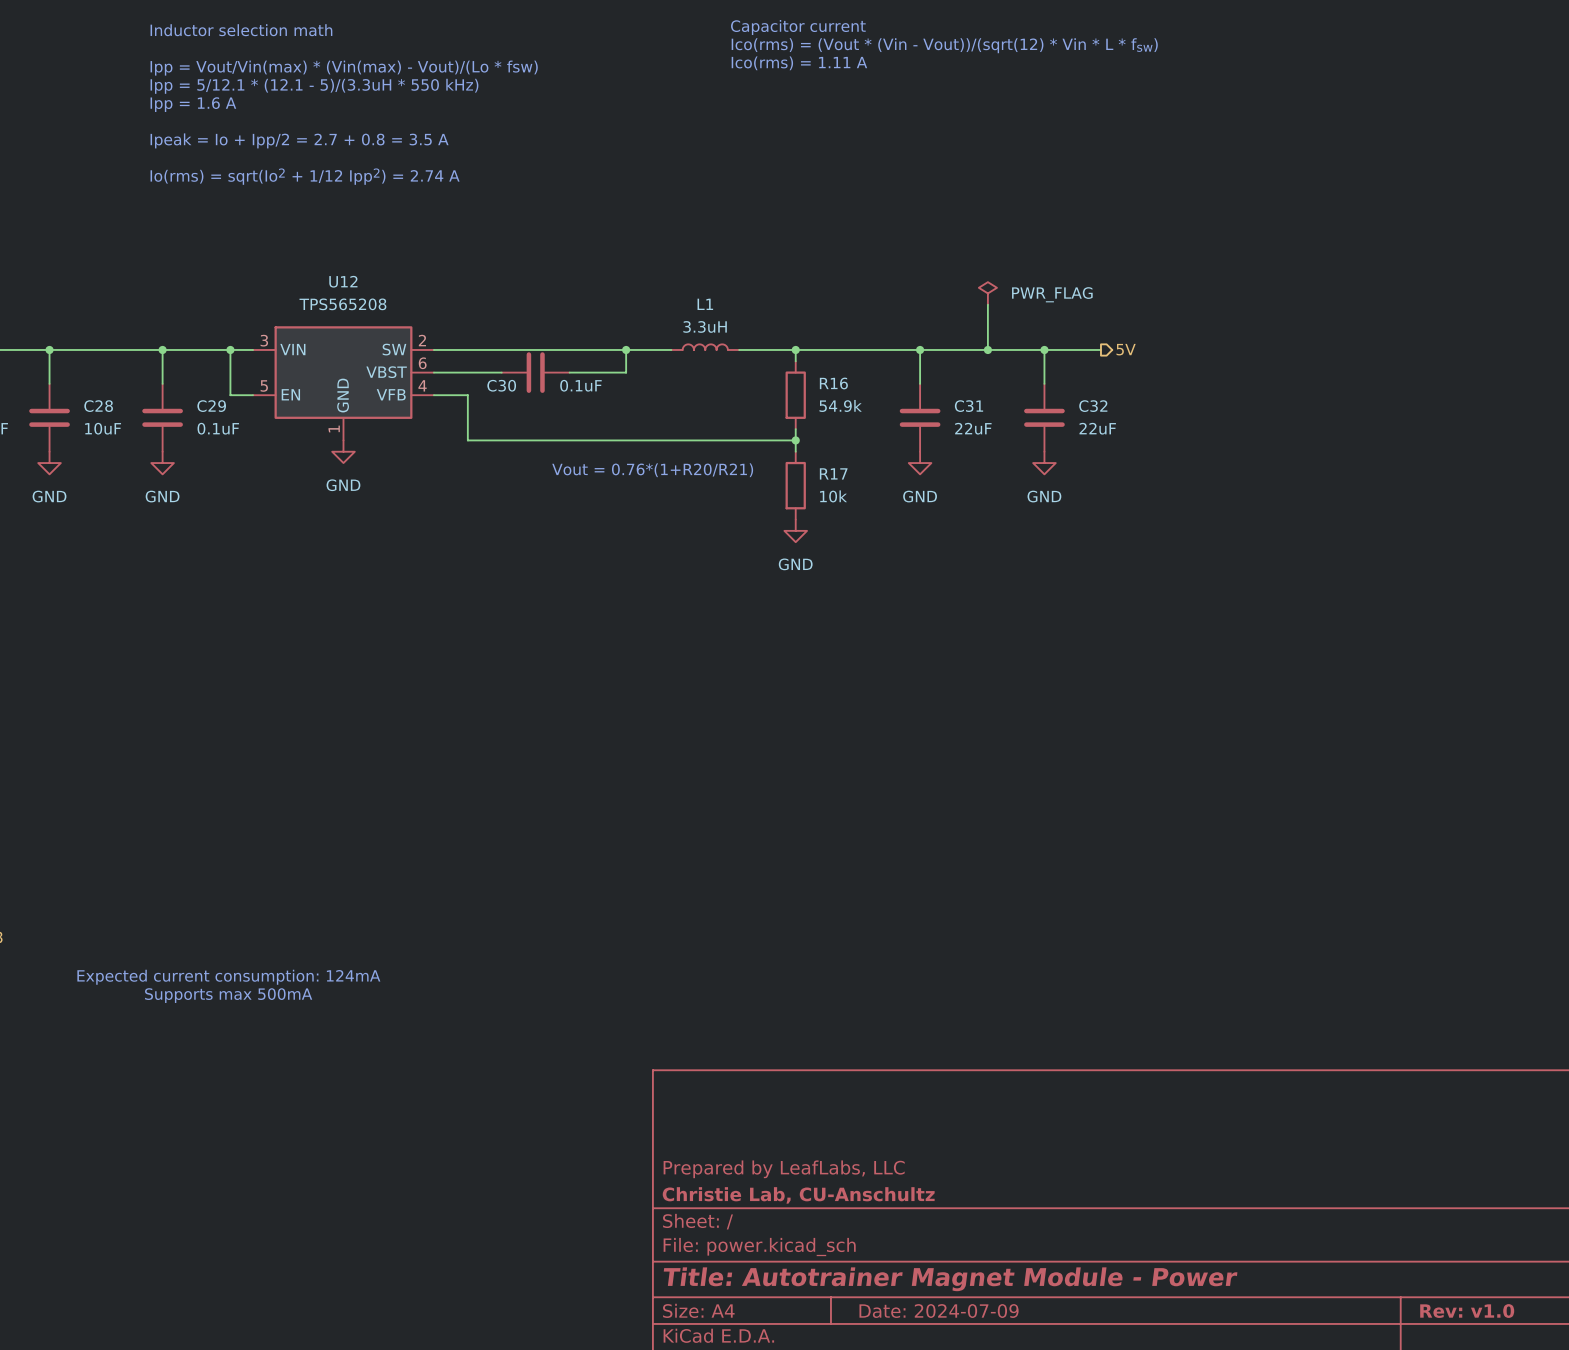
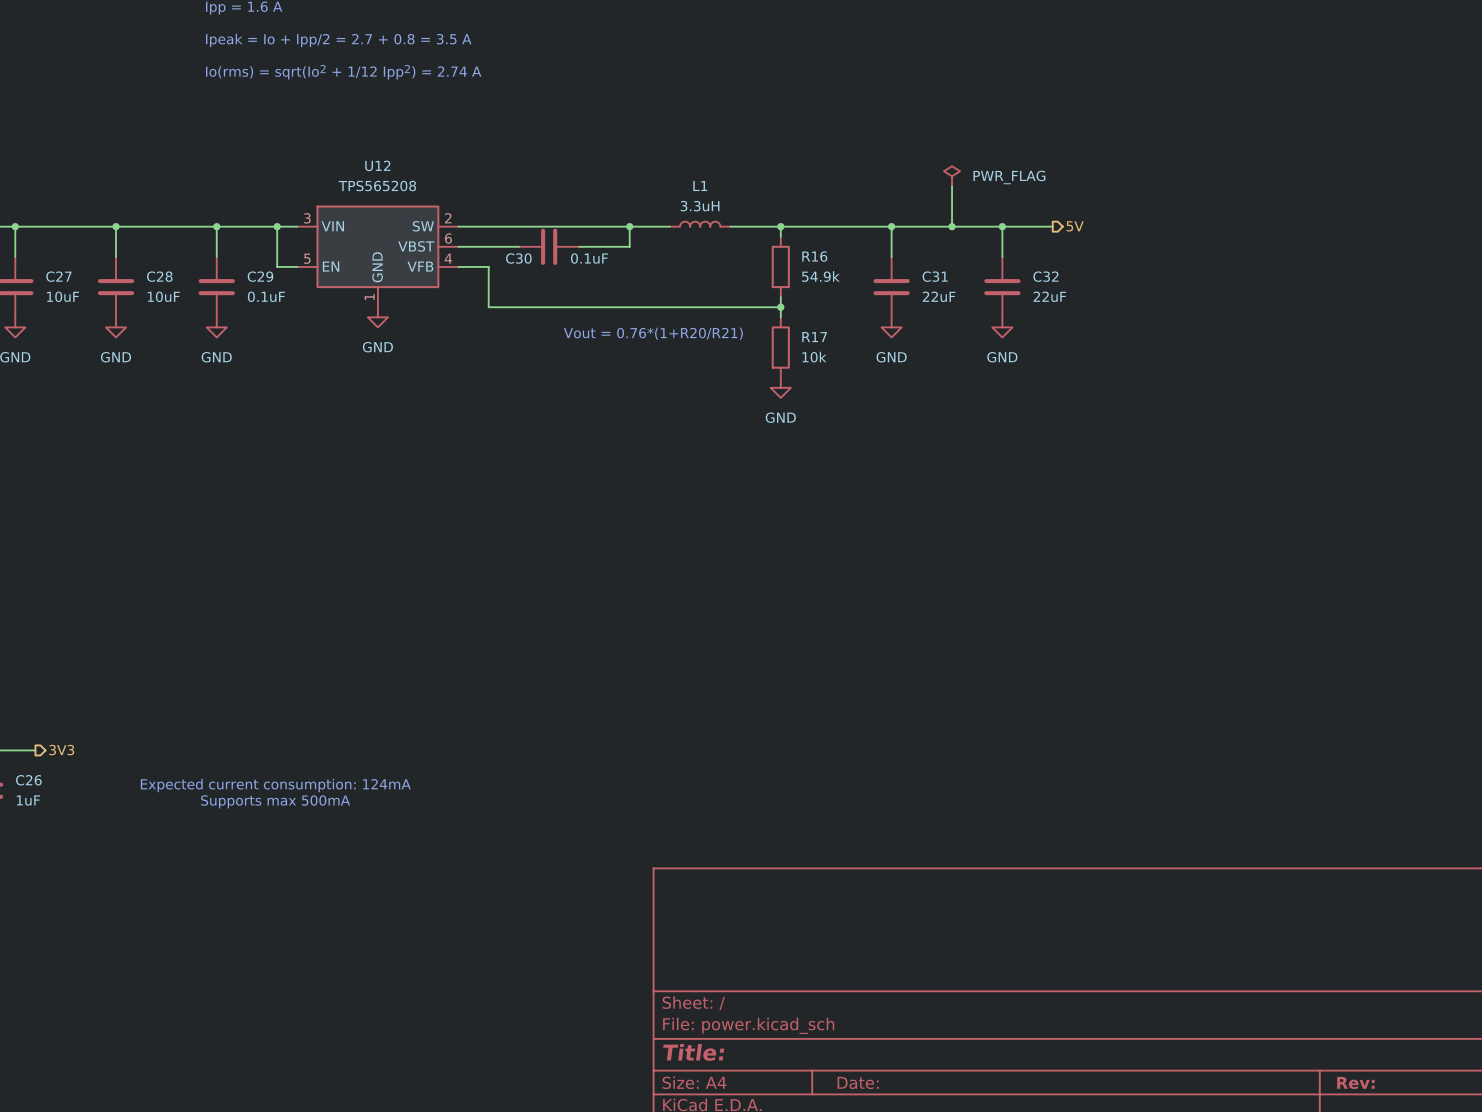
title block: Prepared by LeafLabs, LLC (784, 1169) -> none
title block: Christie Lab, CU-Anschultz (798, 1195) -> none
title block: Title: Autotrainer Magnet Module - Power (950, 1279) -> Title: (693, 1052)
title block: Date: 2024-07-09 (939, 1311) -> Date: (858, 1082)
title block: Rev: v1.0 (1467, 1311) -> Rev: (1355, 1082)

